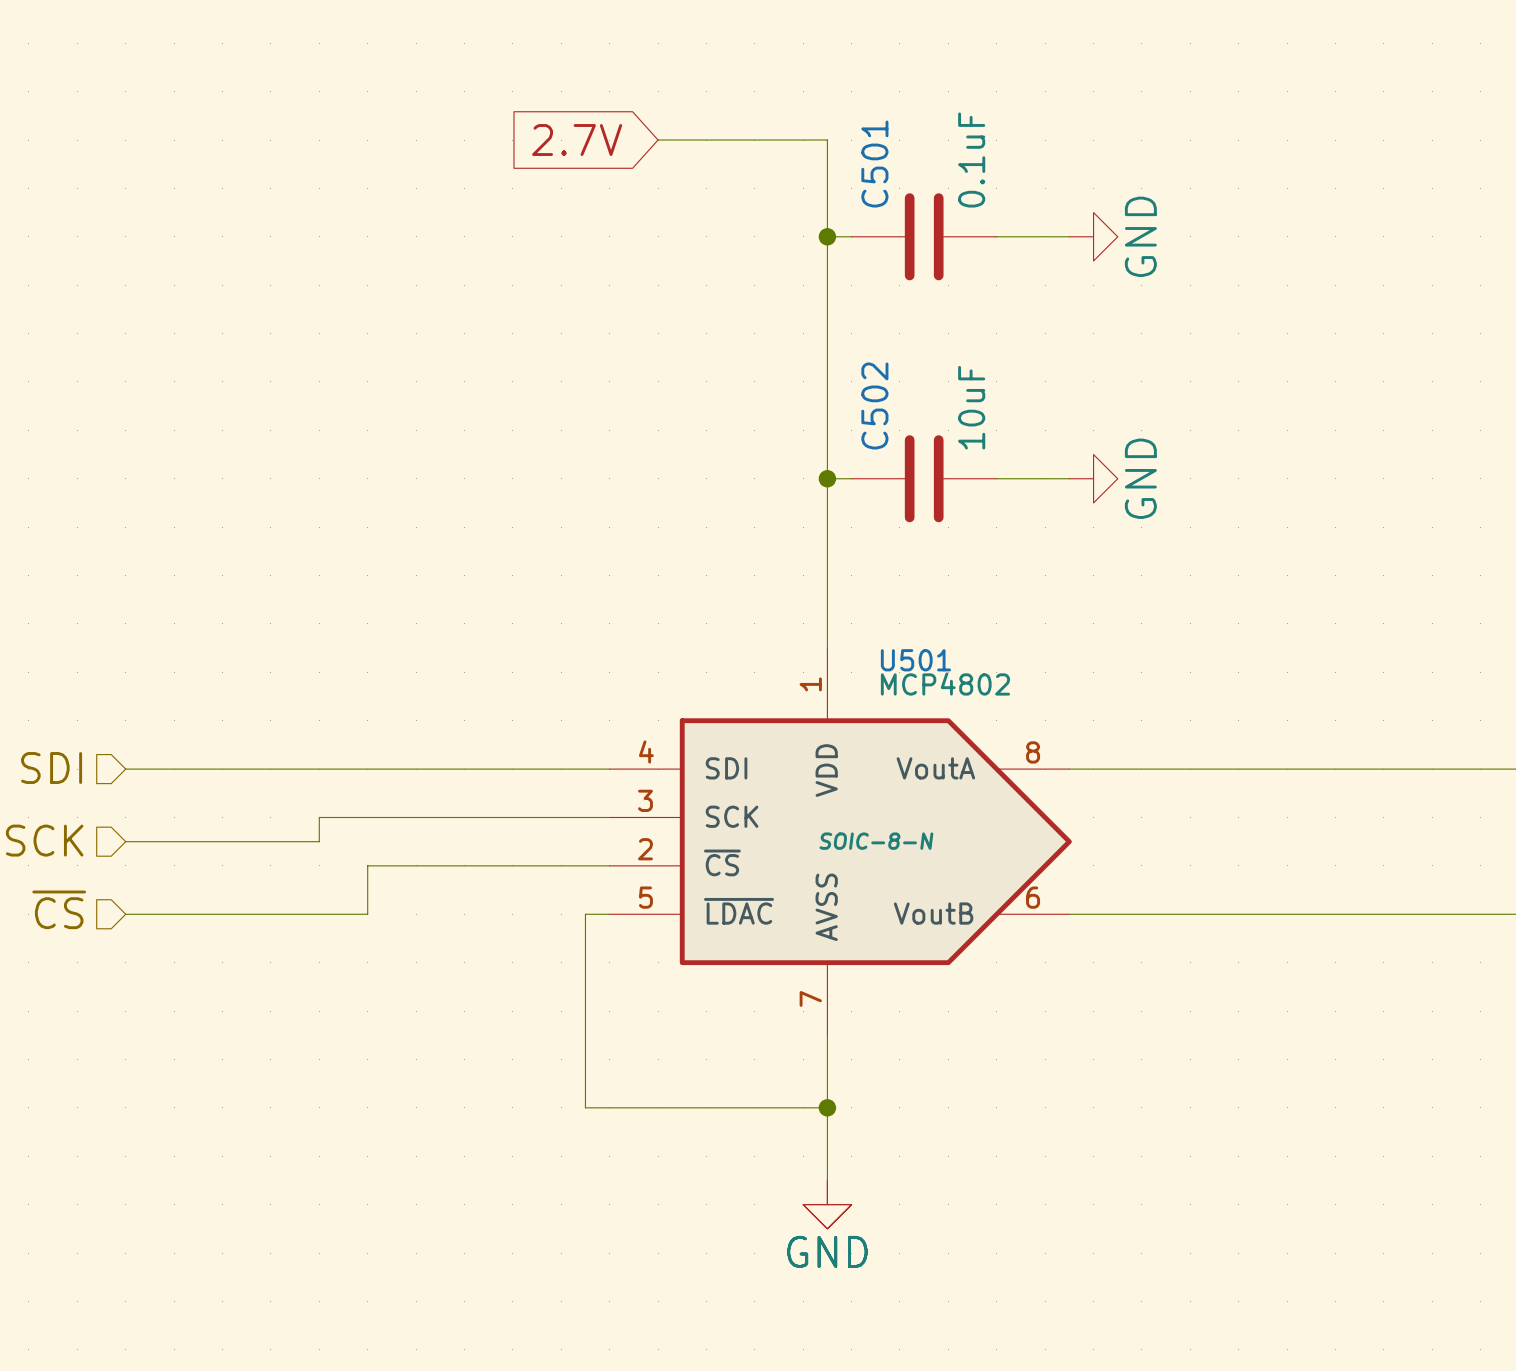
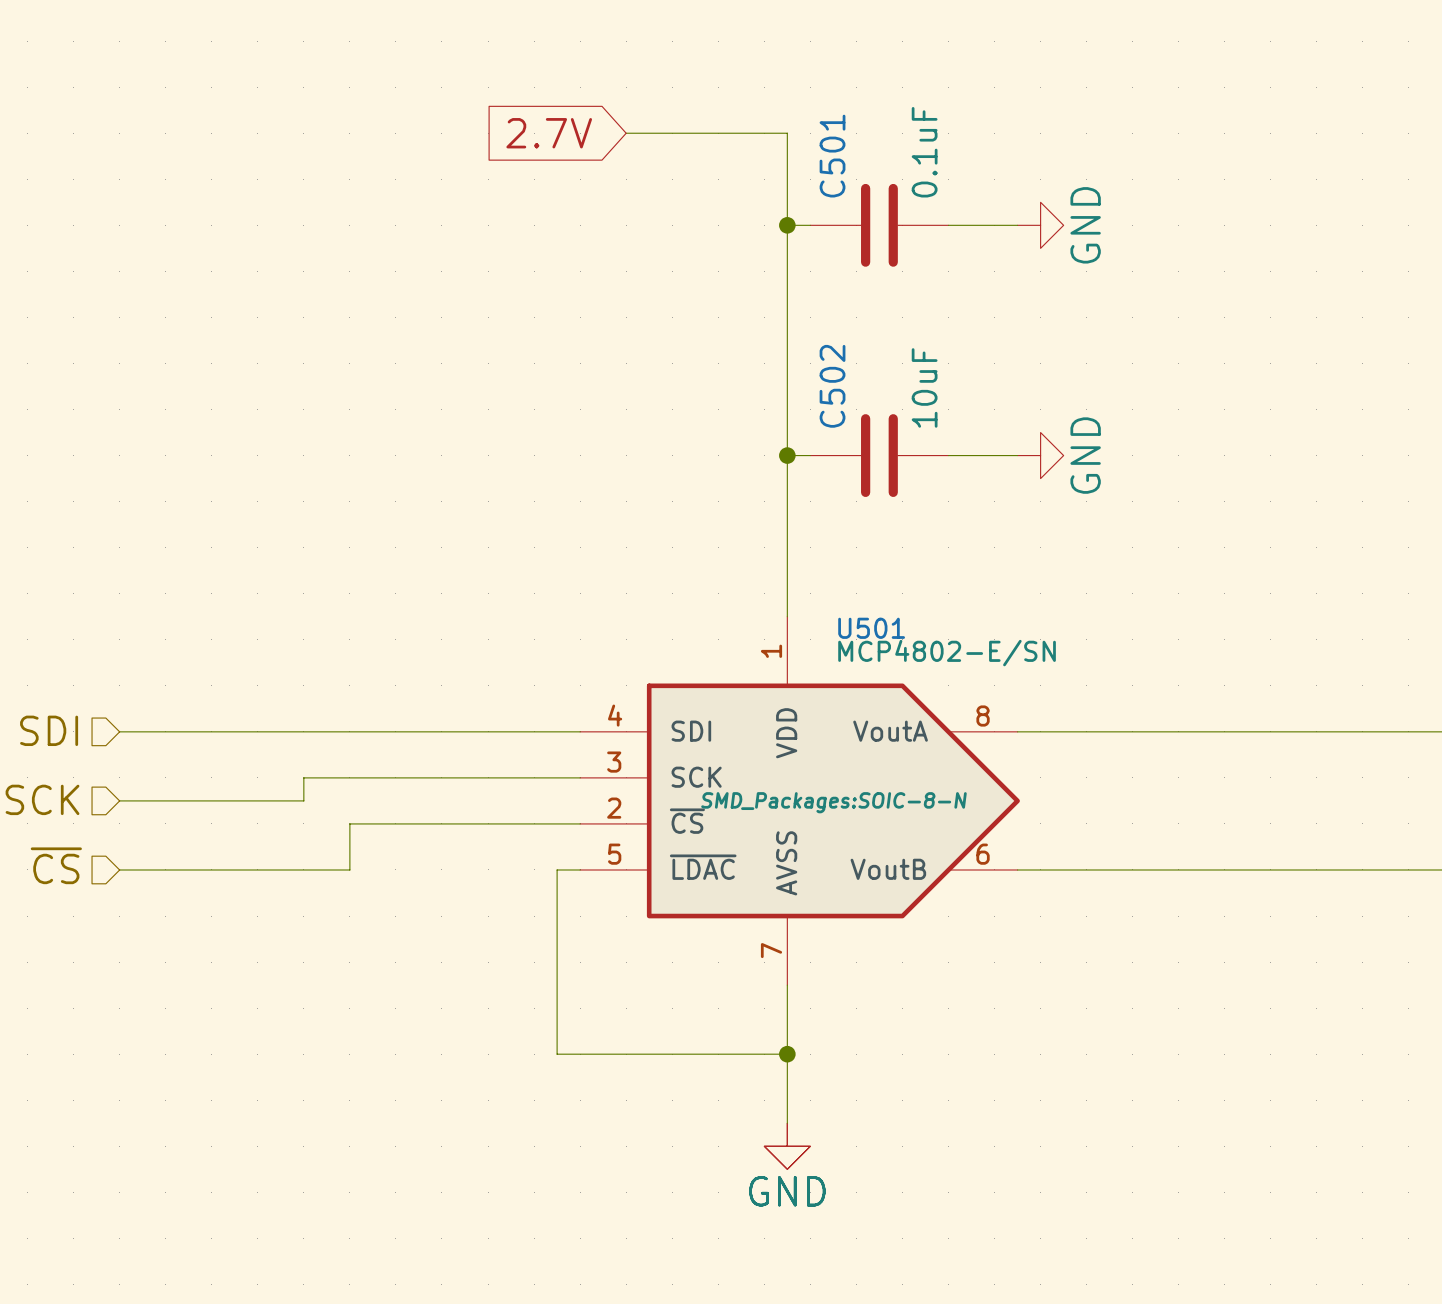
U501 value: MCP4802 (945, 684) -> MCP4802-E/SN (947, 653)
U501 text: SOIC-8-N (876, 841) -> SMD_Packages:SOIC-8-N (833, 802)

